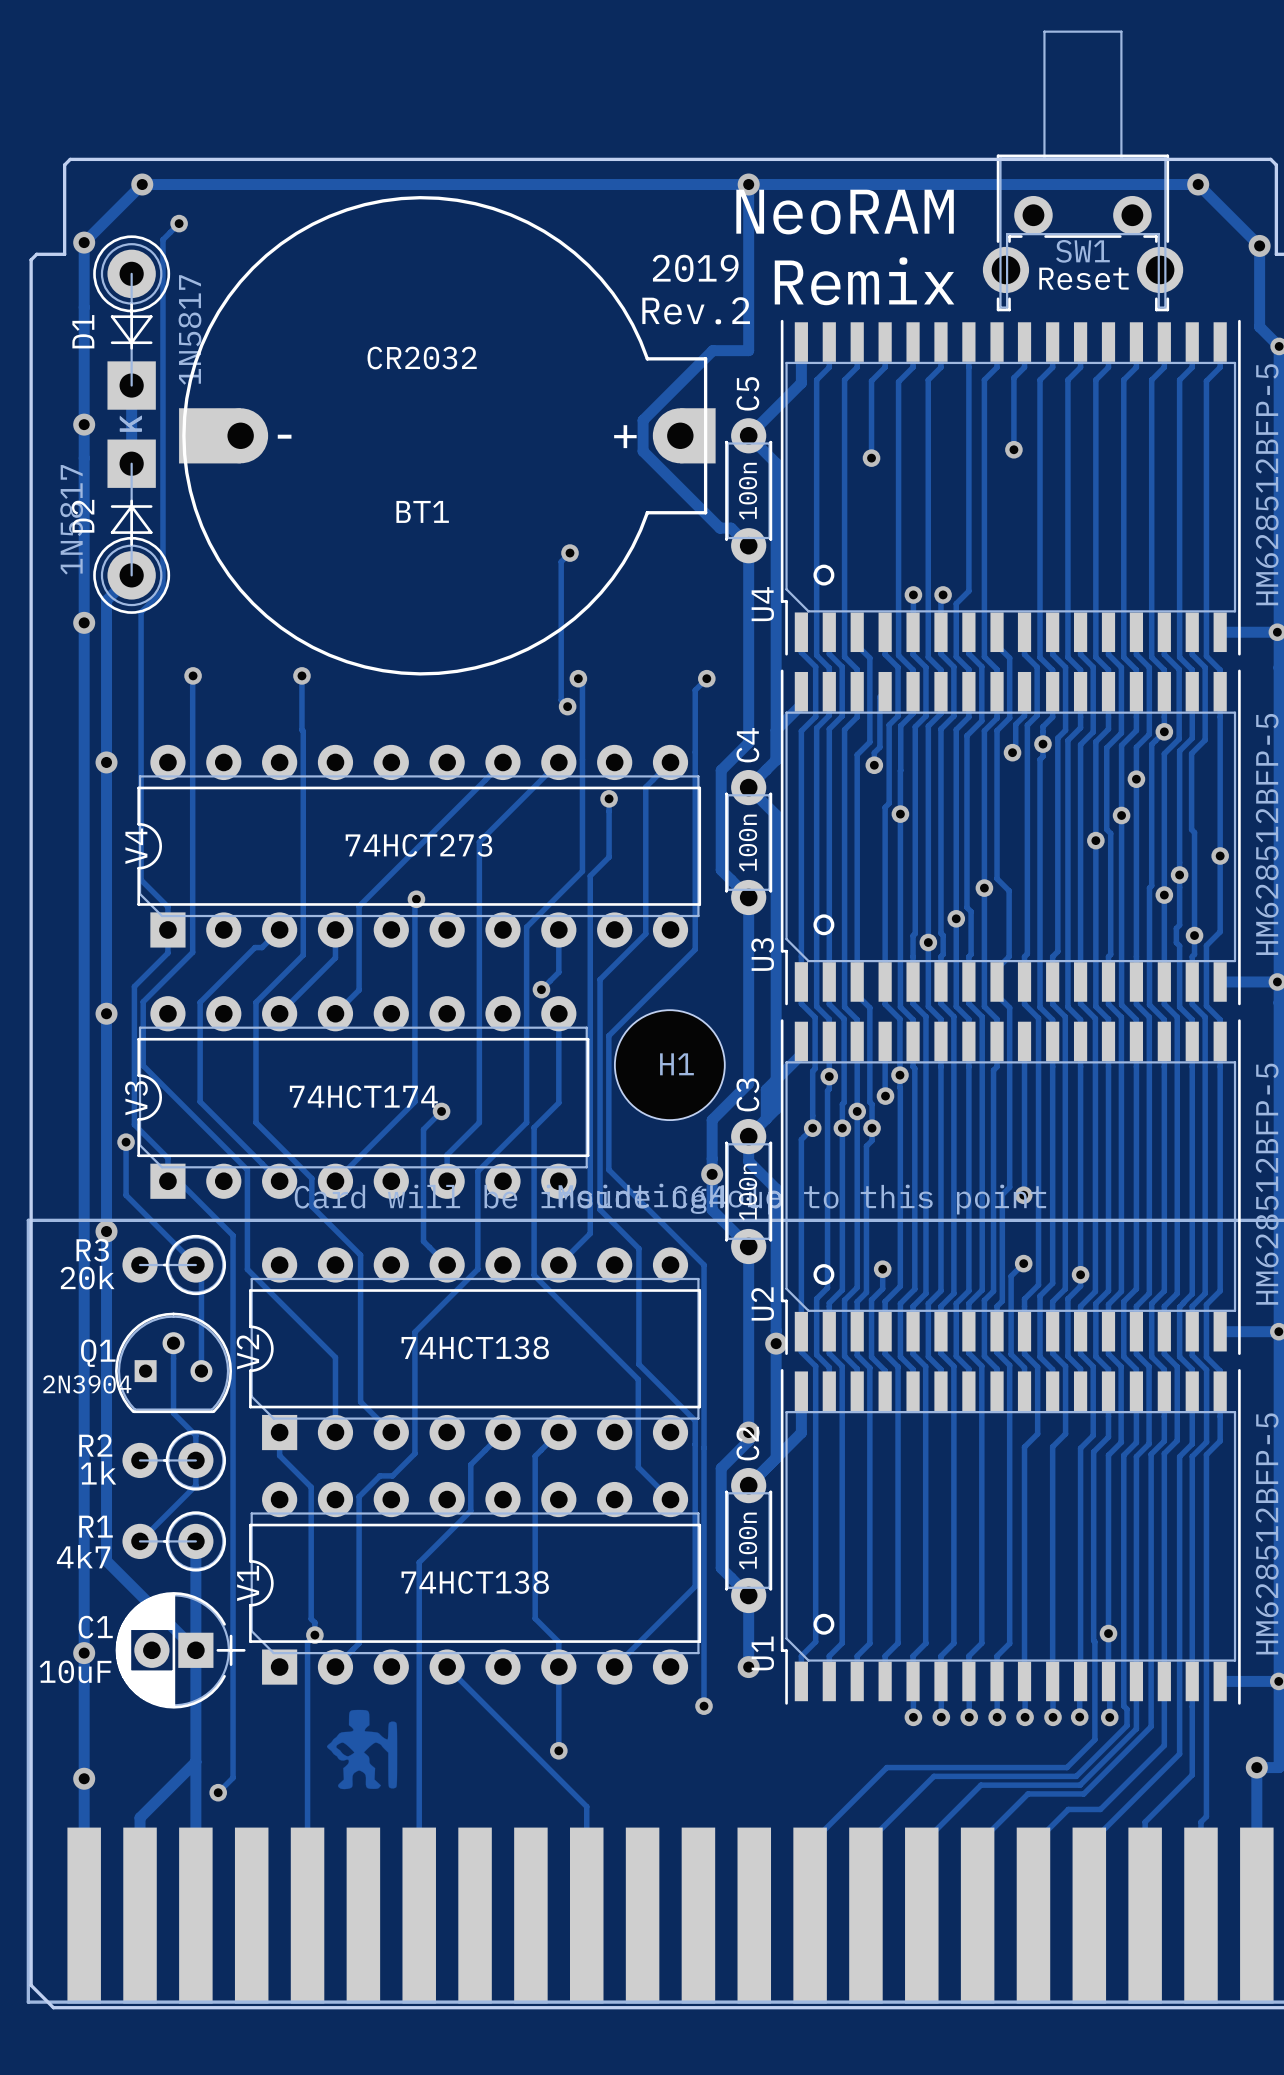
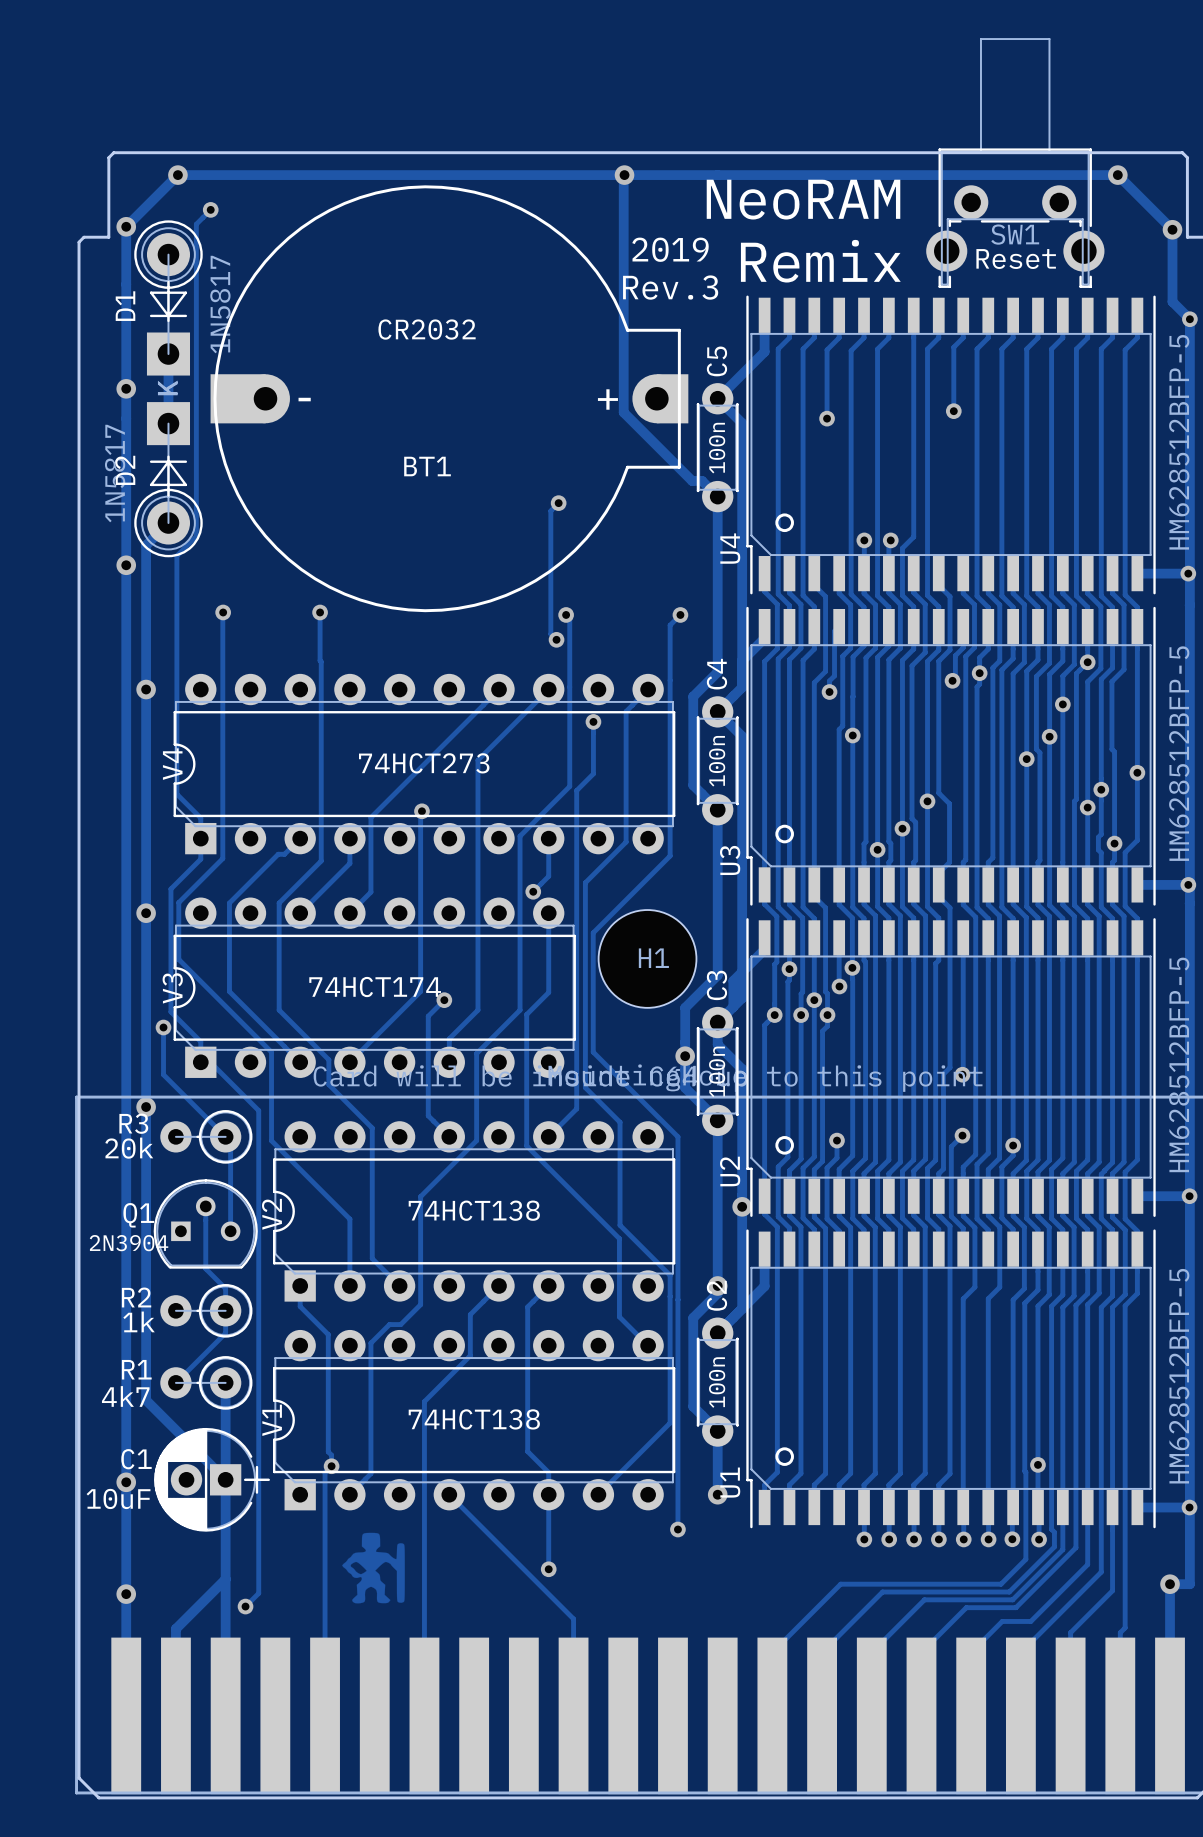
track: (748, 184) (748, 350) (712, 350) (643, 420) -> (625, 175) (623, 177) (623, 385)
via position: (748, 184) -> (624, 175)
text: Rev.2 (696, 310) -> Rev.3 (670, 287)

